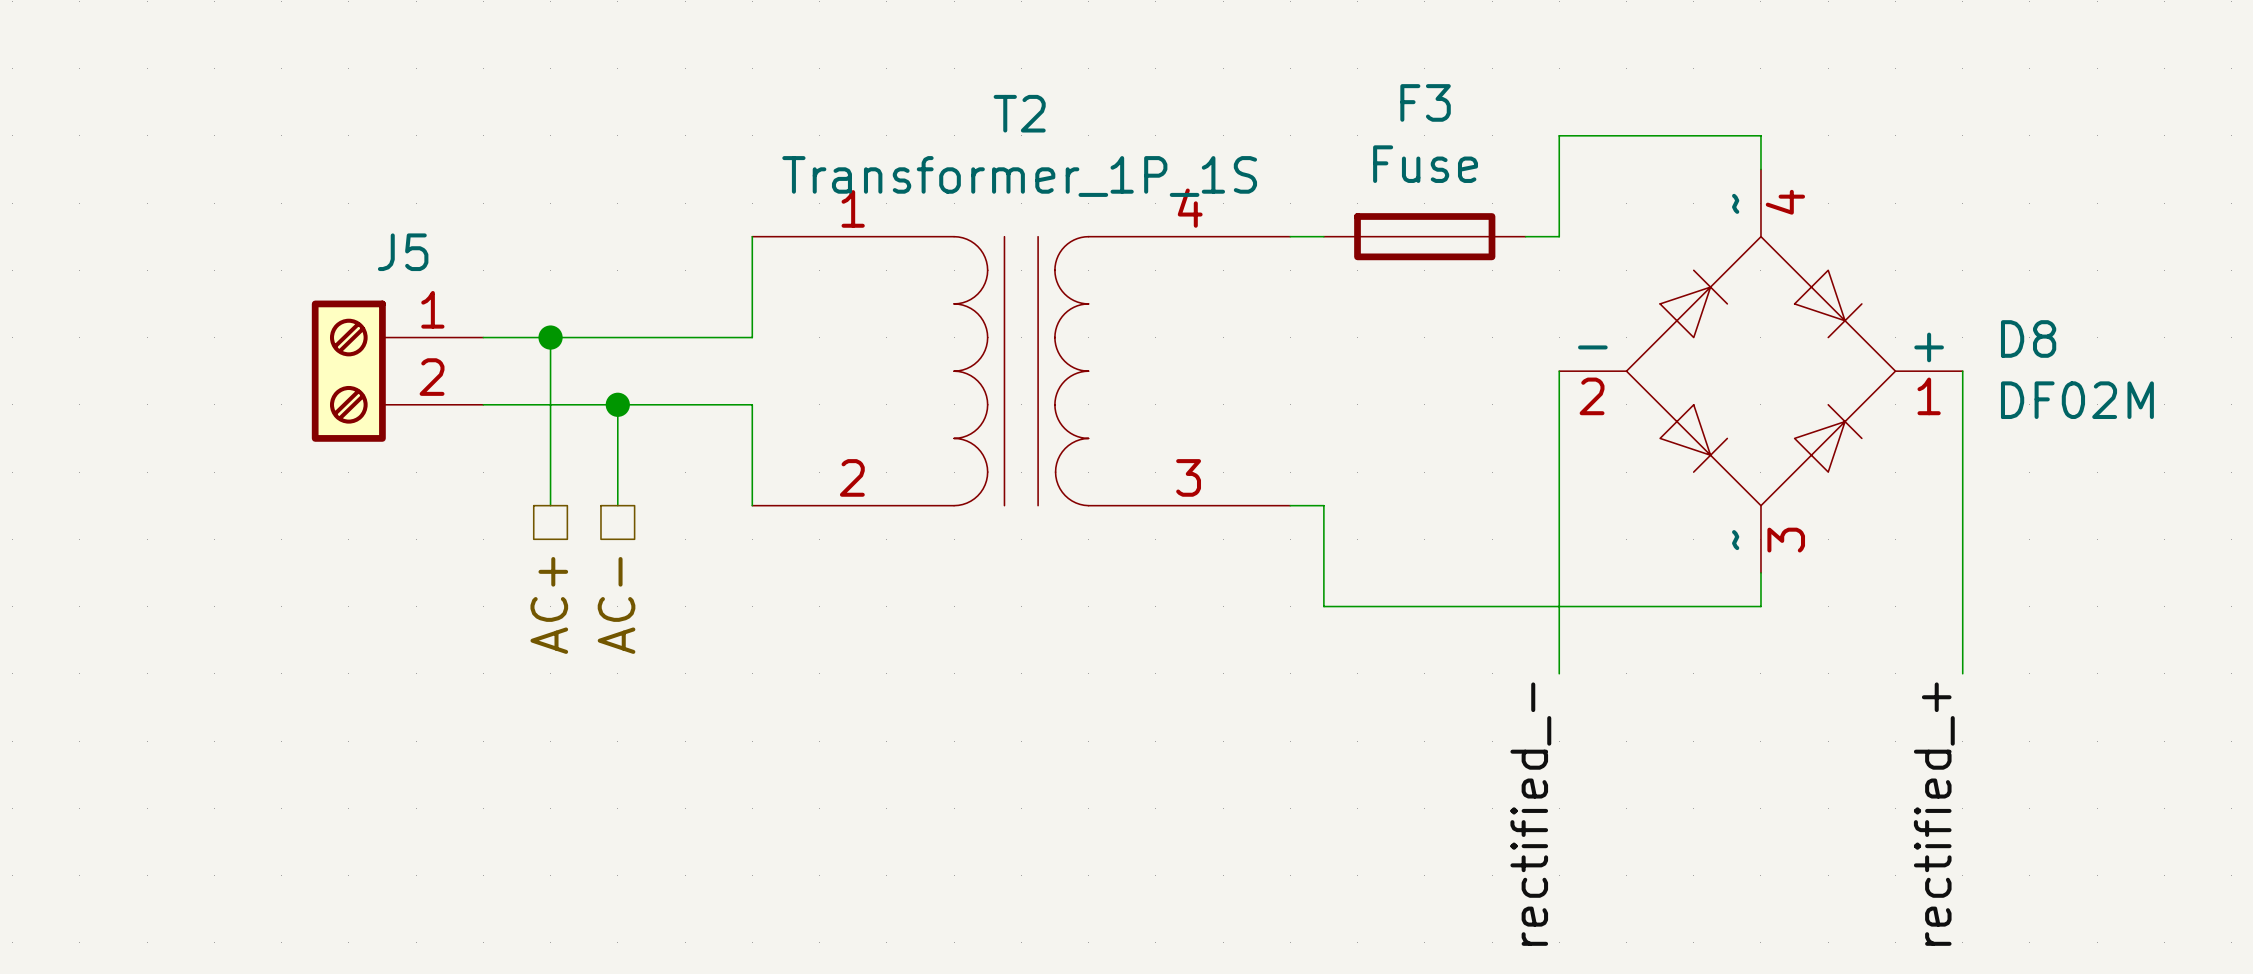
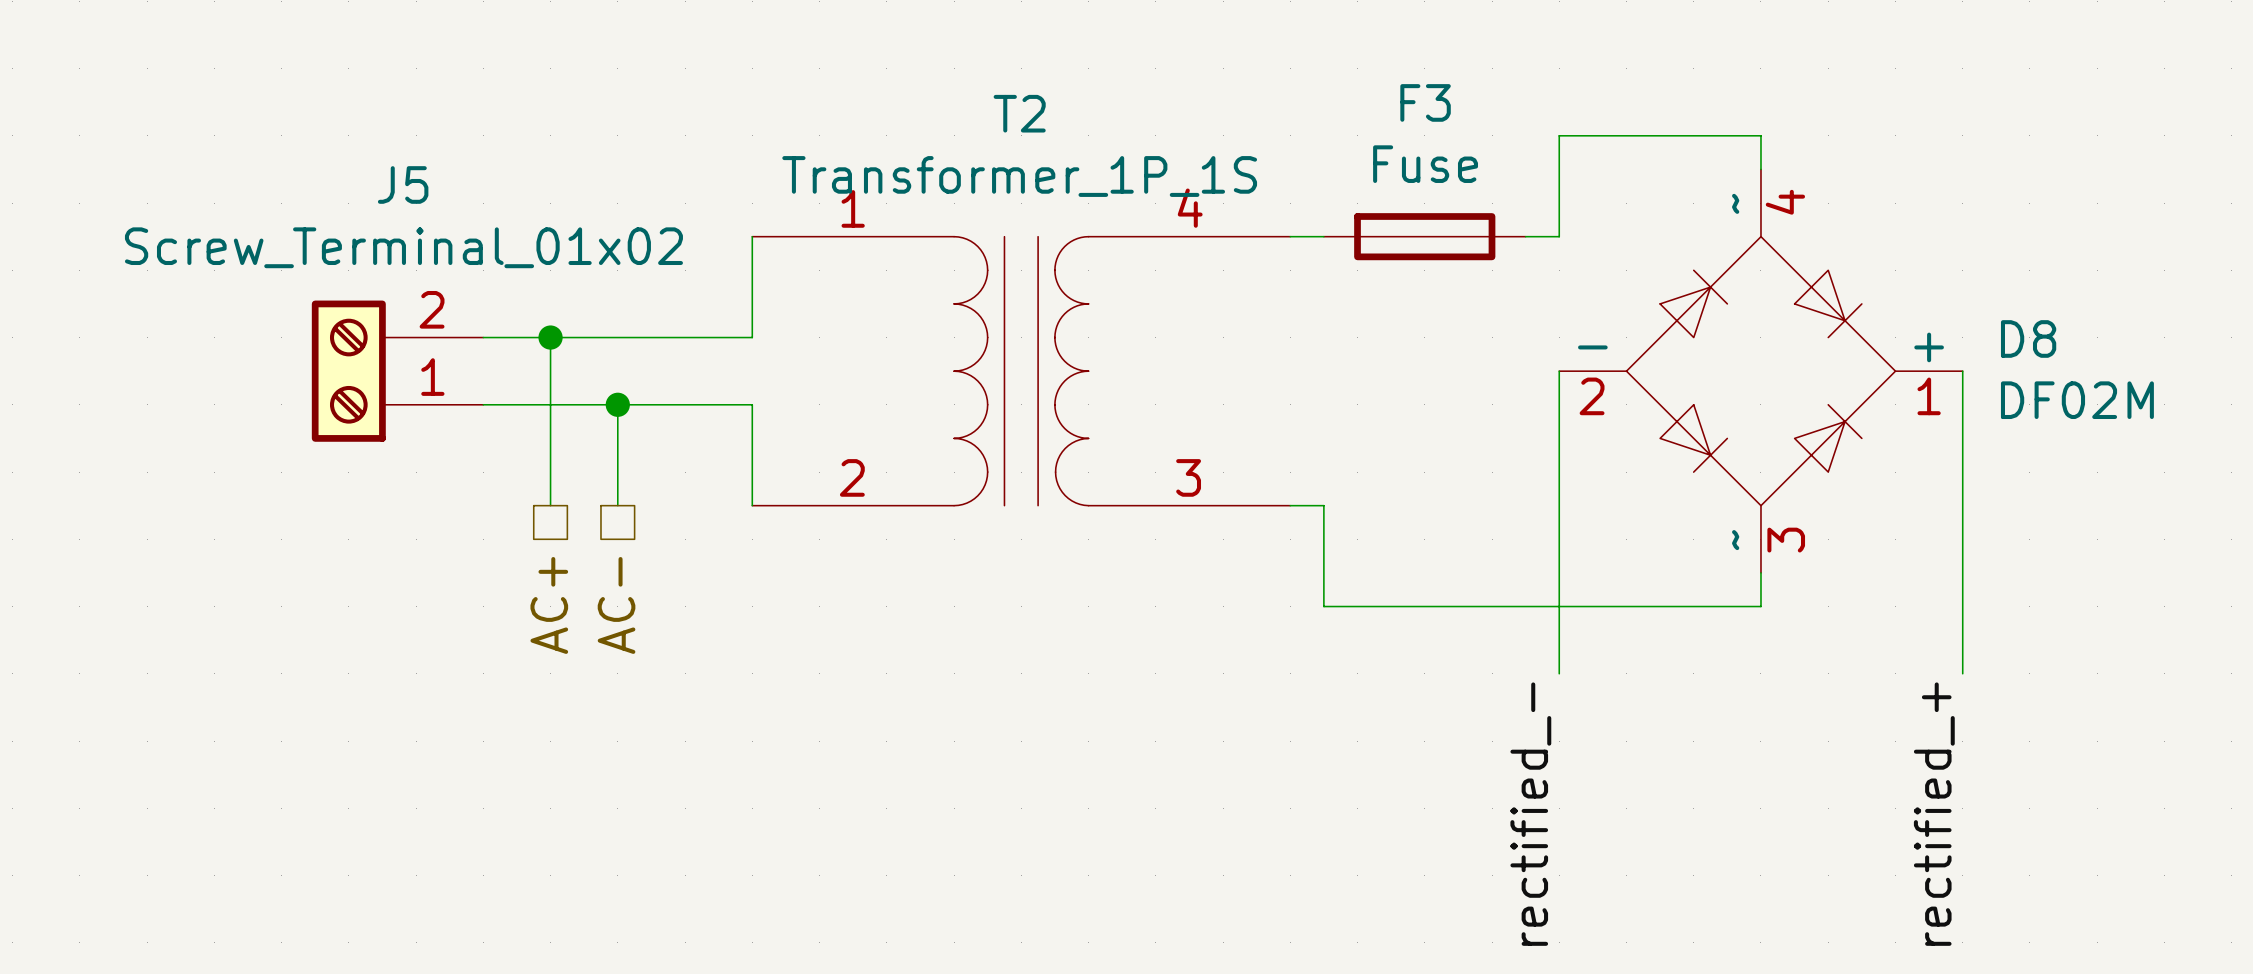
J5 value: none -> Screw_Terminal_01x02 (403, 247)
J5 name position: J5 (403, 252) -> J5 (403, 184)
J5 flip: as is (348, 371) -> up-down (348, 371)

